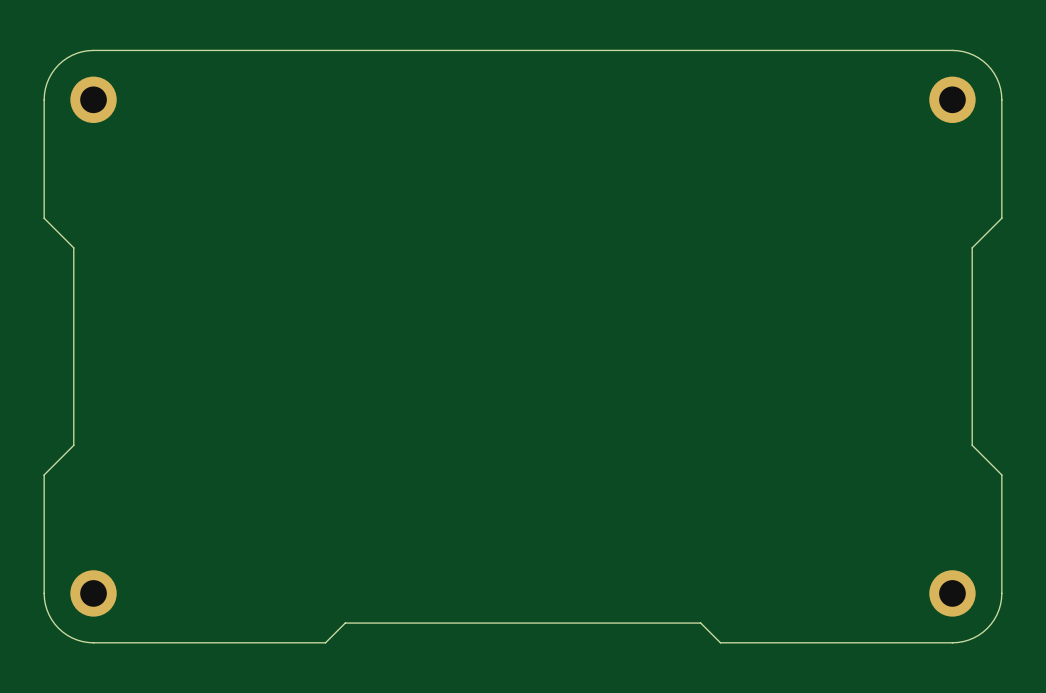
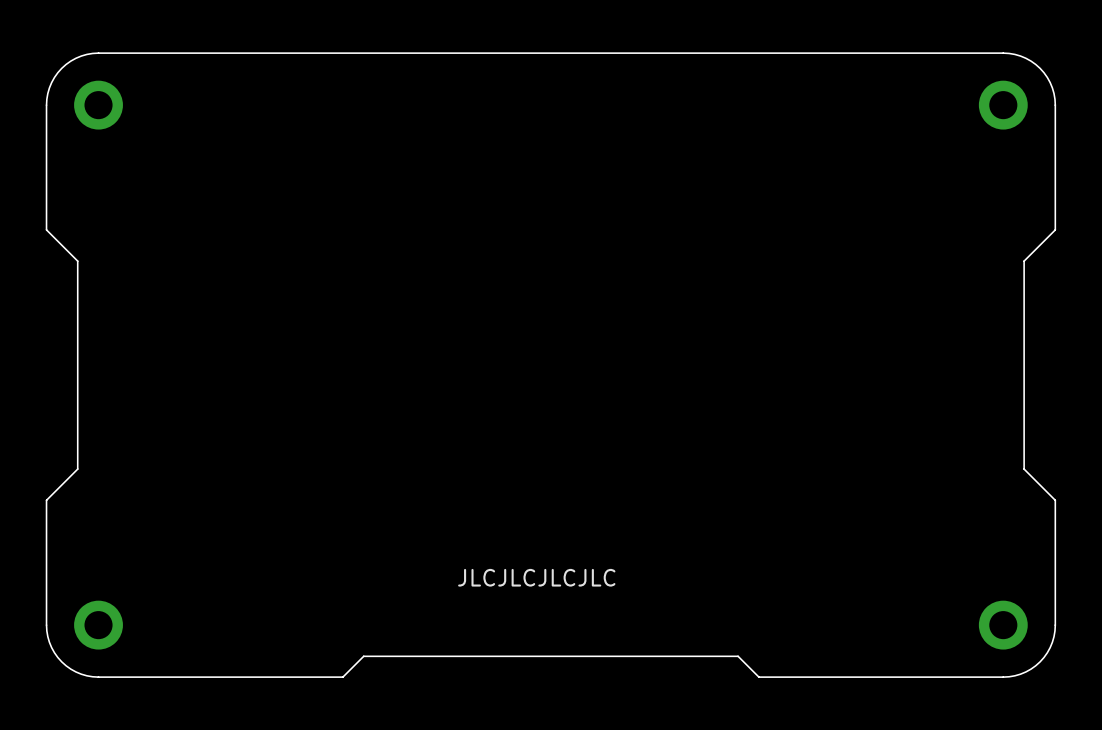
text: none -> JLCJLCJLCJLC (536, 577)

